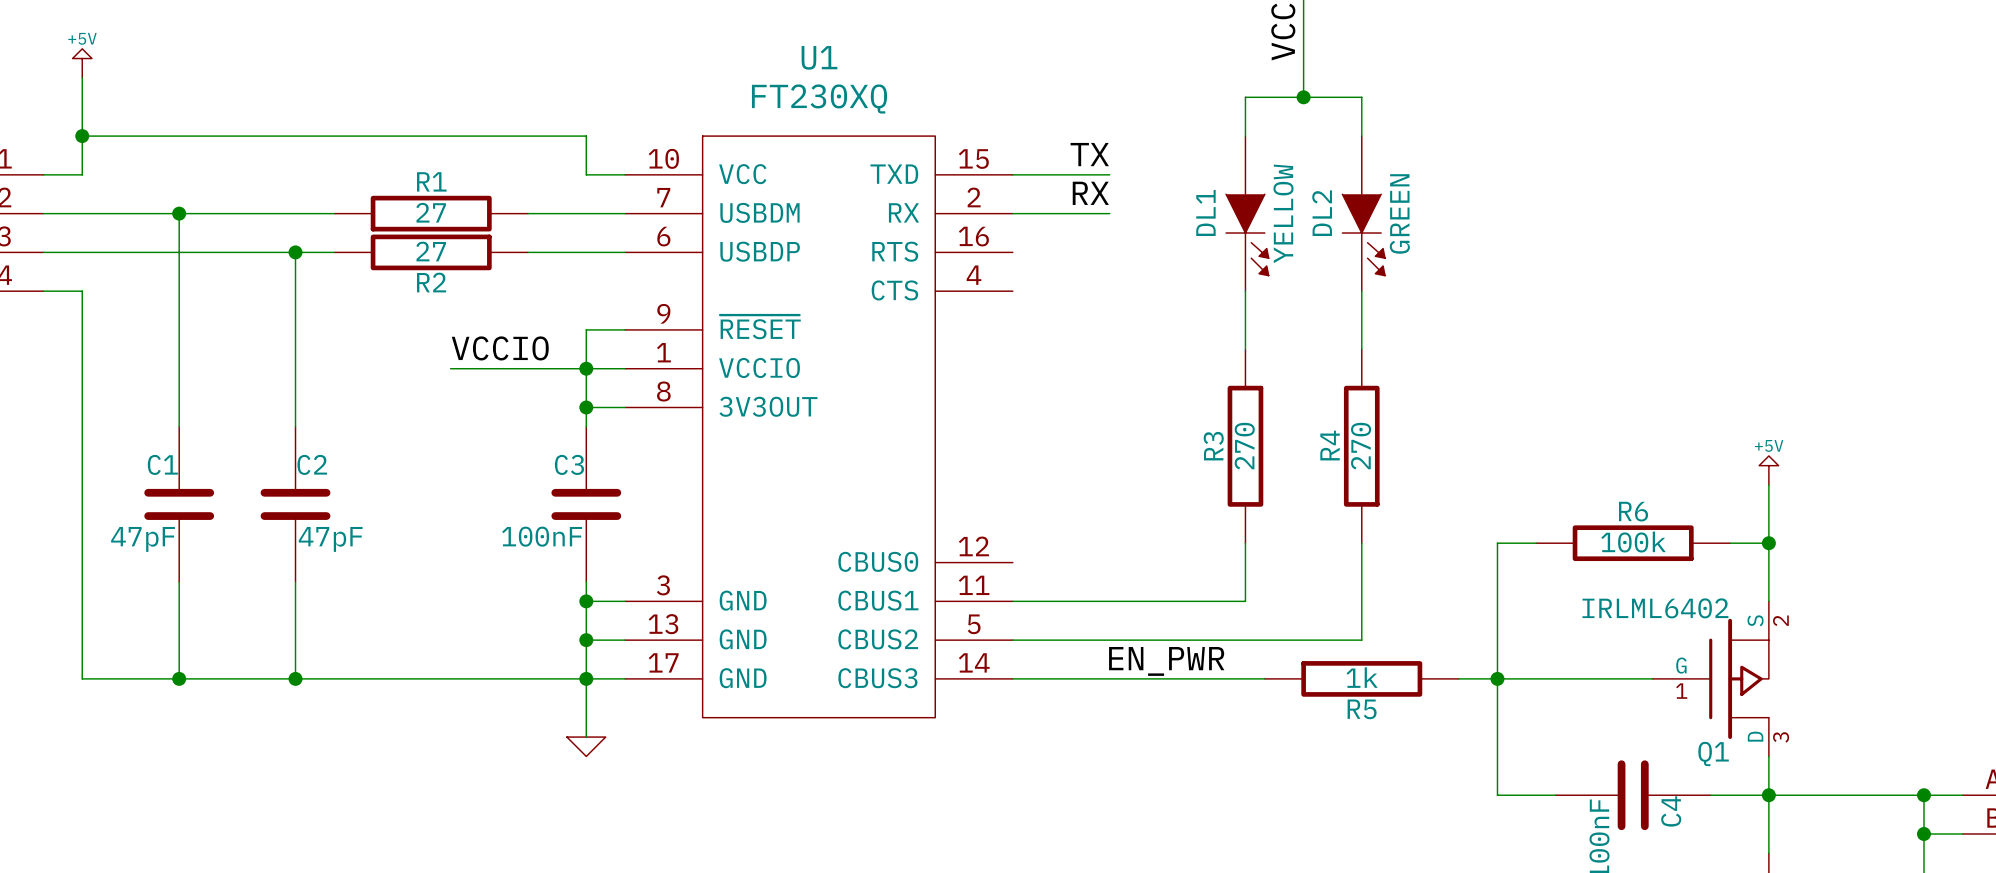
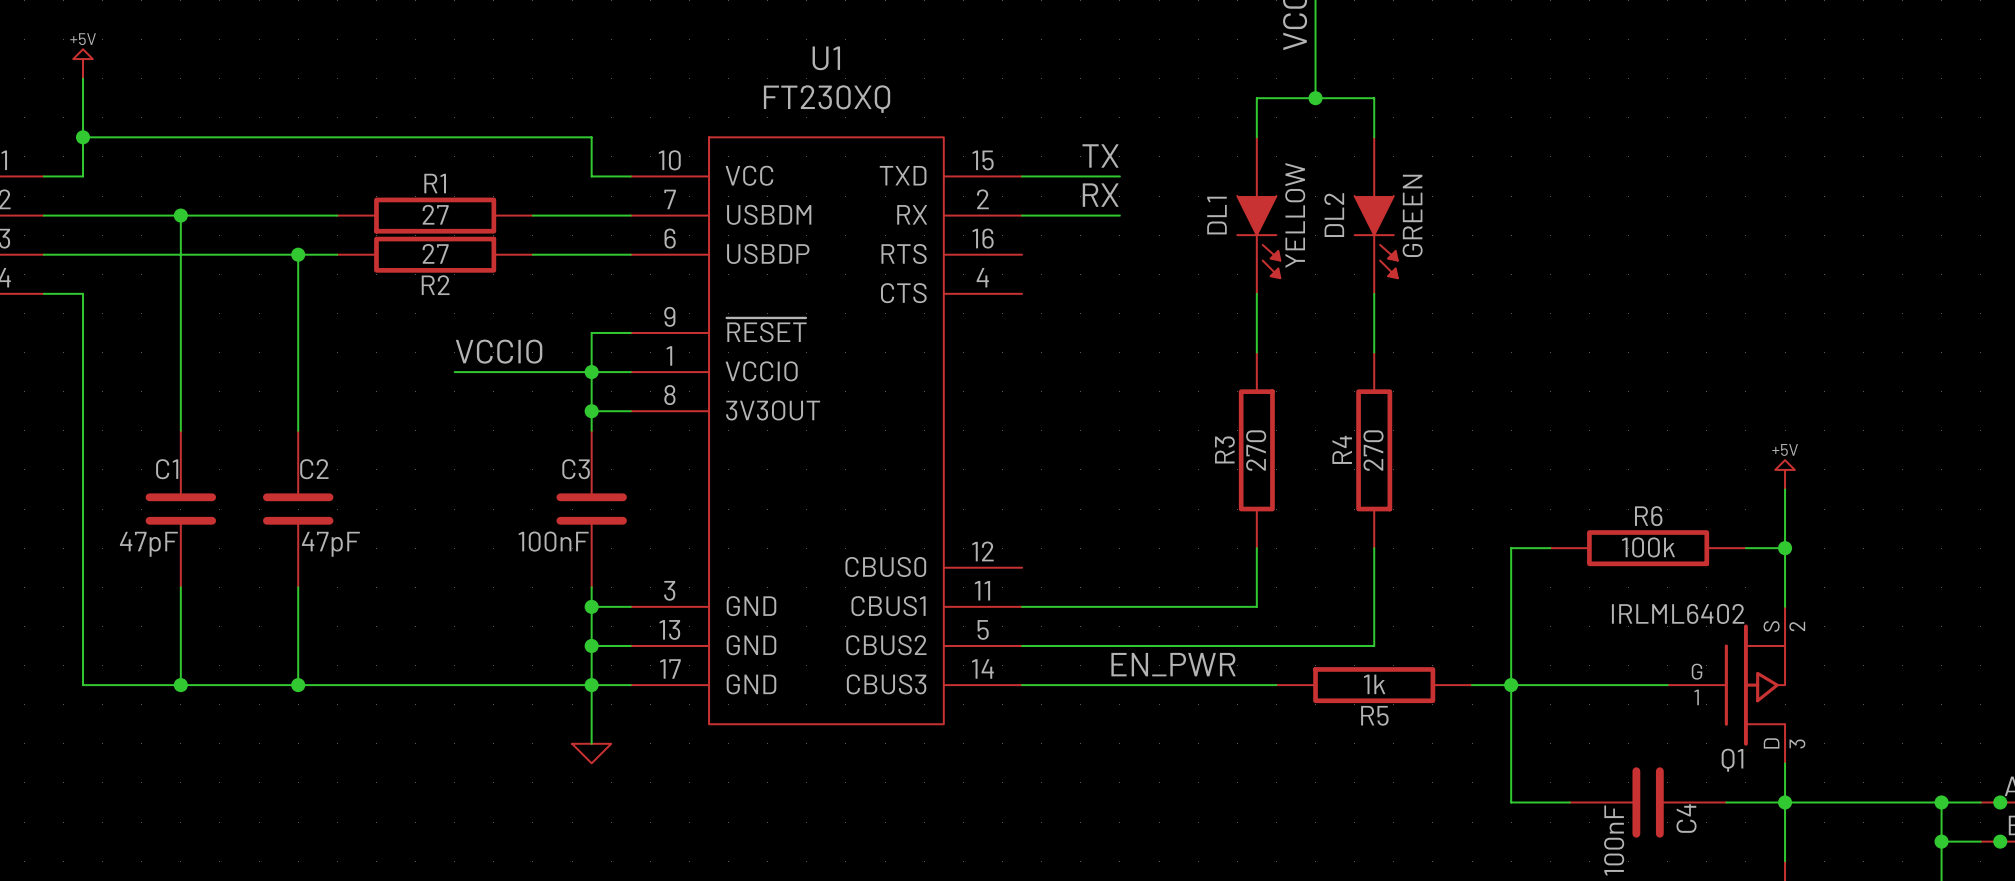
junction: none -> (2000, 802)
junction: none -> (2000, 841)

